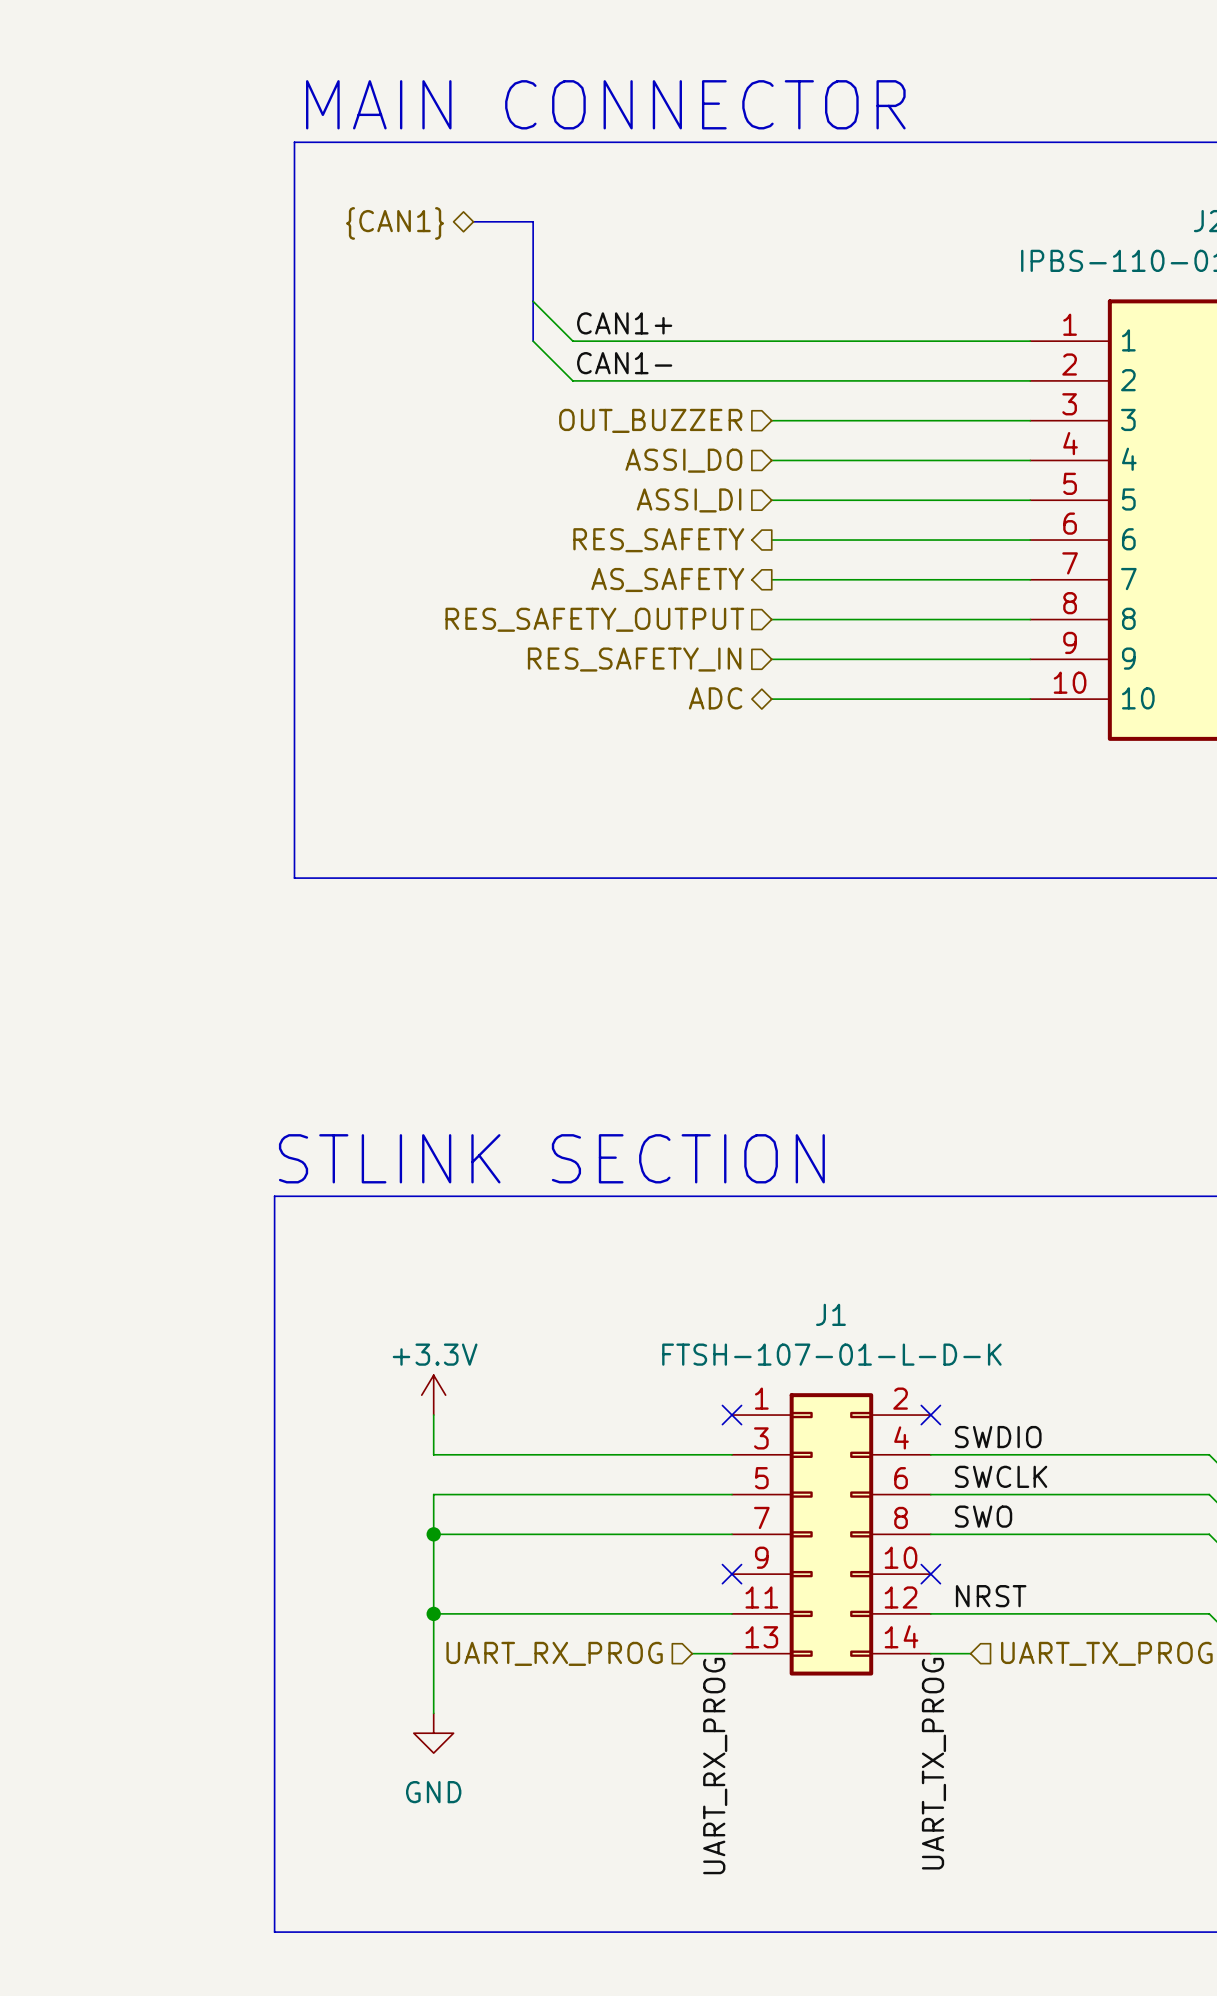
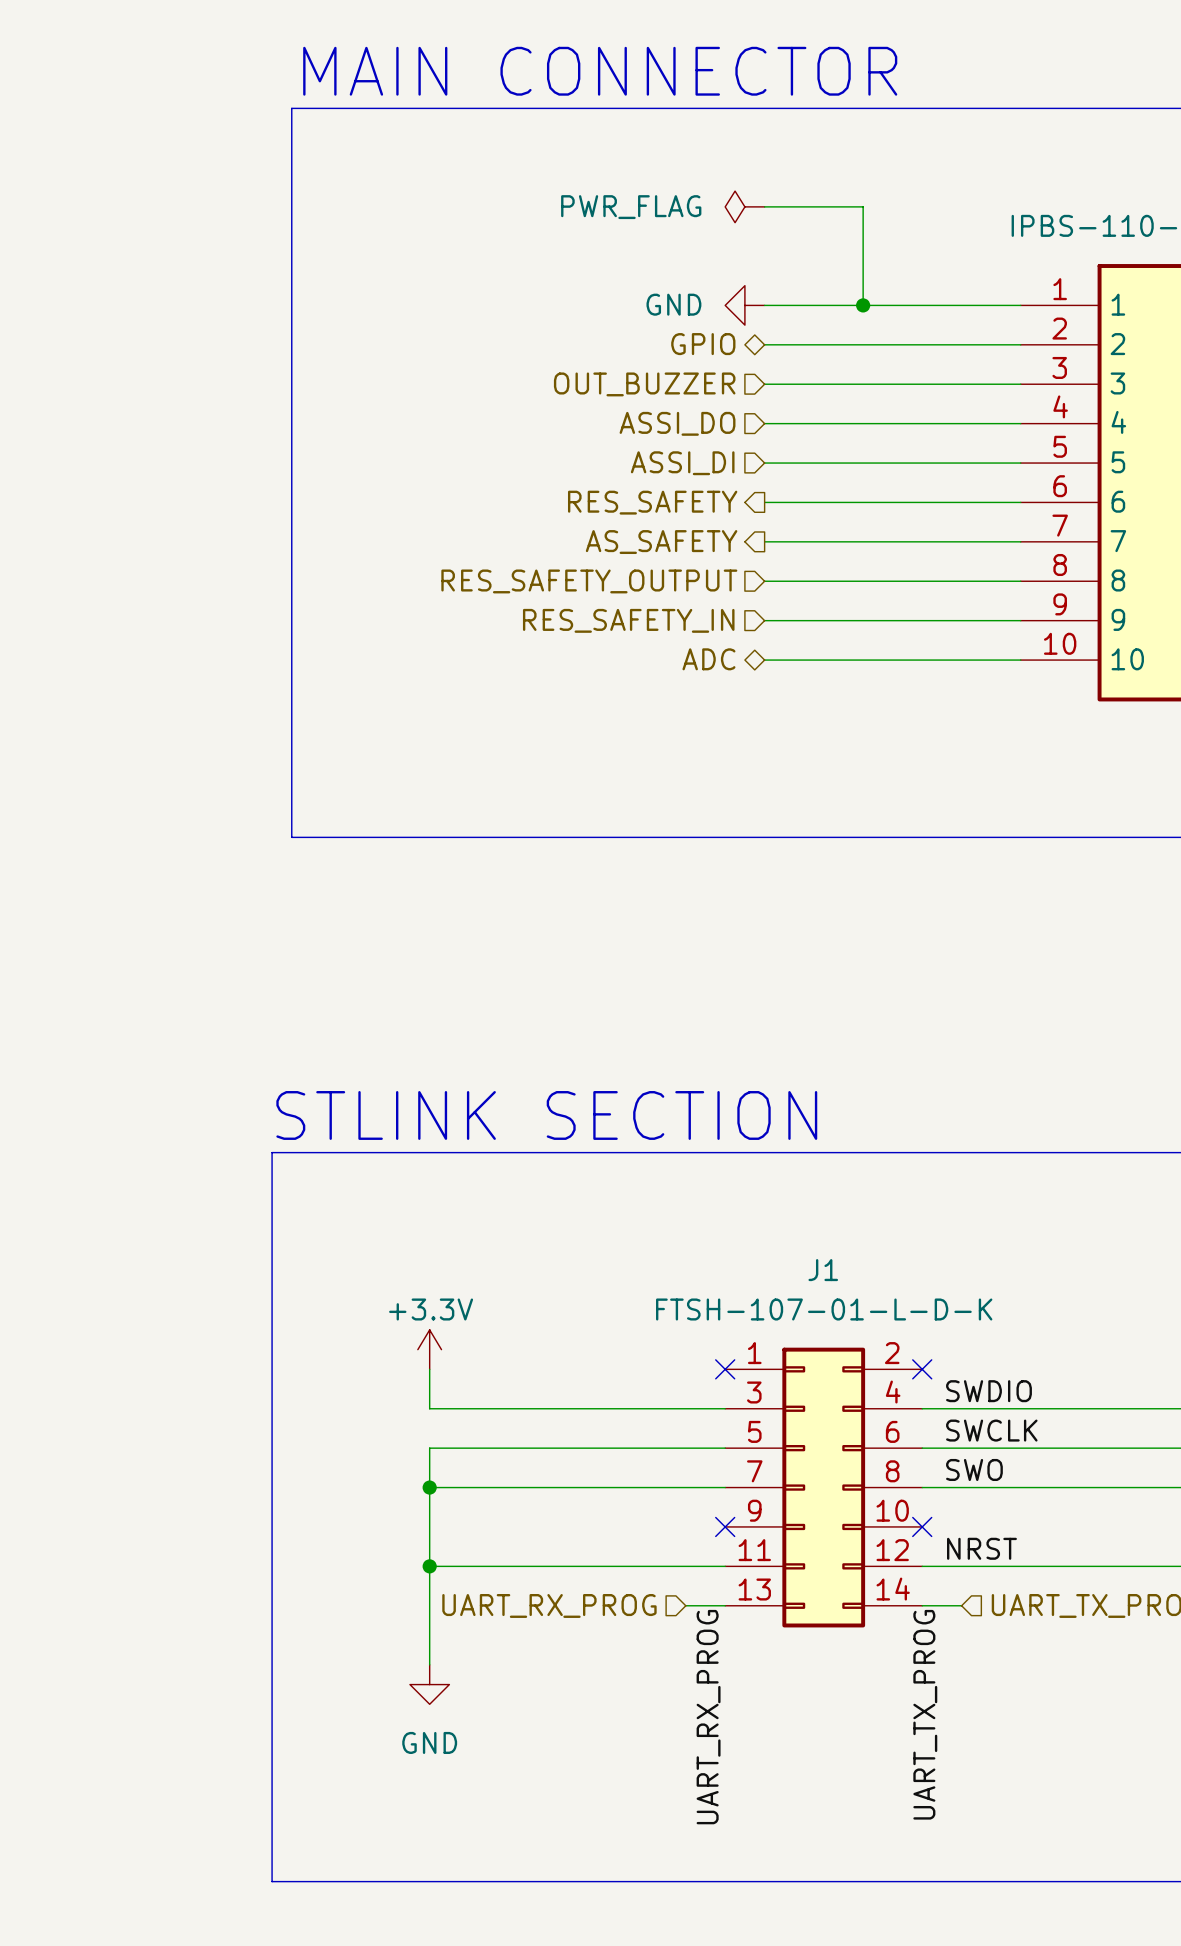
bus: (473, 221) (533, 221) (533, 341) -> none
hierarchical label: {CAN1} (395, 223) -> none
power symbol: none -> PWR_FLAG (744, 206)
wire: none -> (764, 206) (863, 206) (863, 305)
wire: (533, 301) (572, 341) (771, 341) -> none
label: CAN1+ (624, 323) -> none
wire: (533, 341) (572, 380) (771, 380) -> none
power symbol: none -> GND (744, 305)
junction: none -> (863, 305)
label: CAN1- (624, 363) -> none
hierarchical label: none -> GPIO (703, 344)

